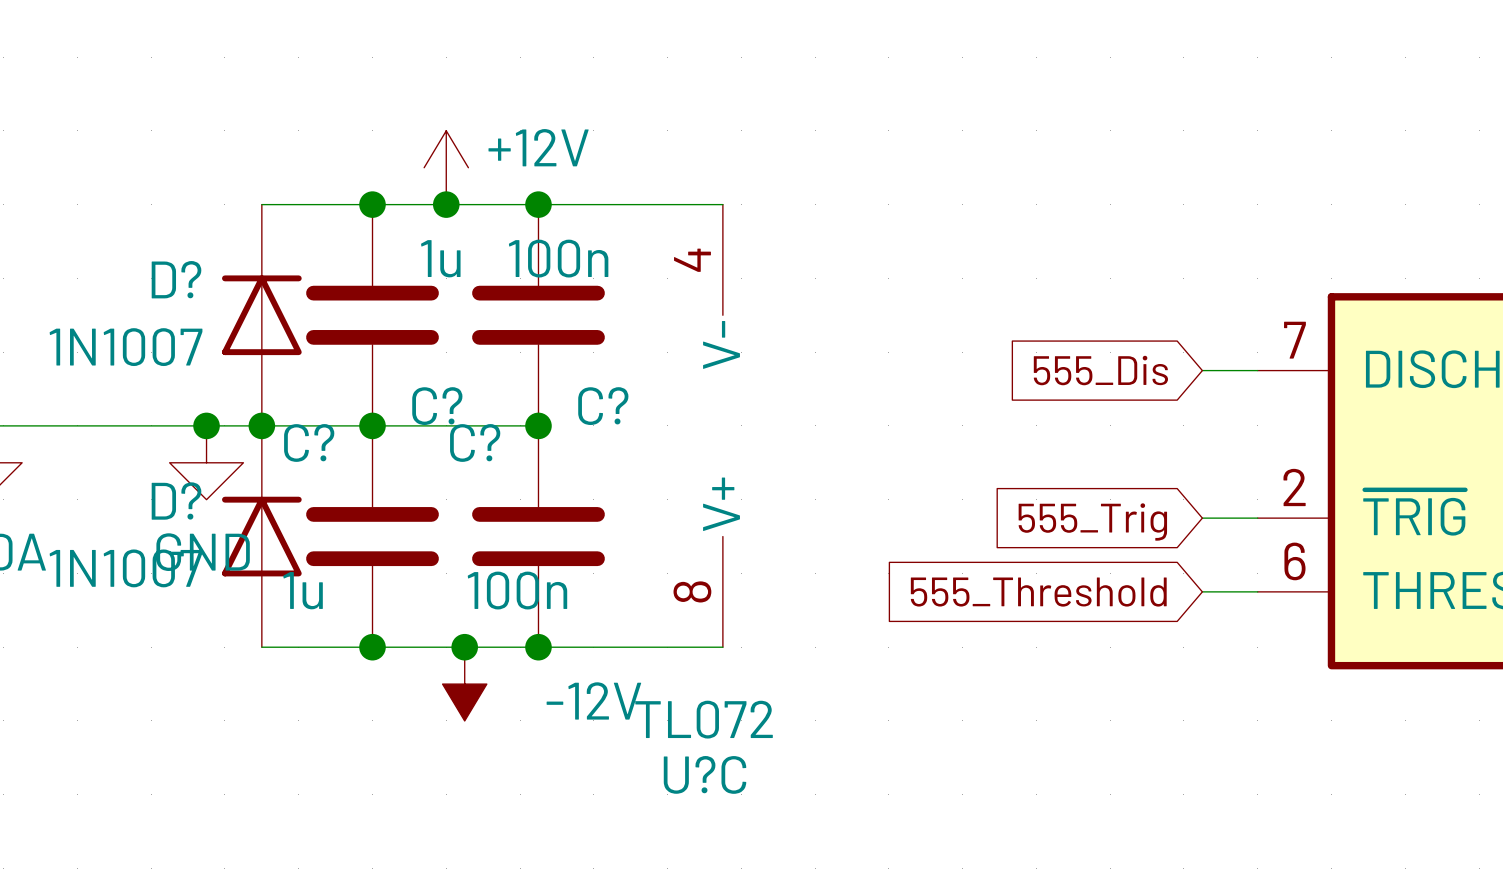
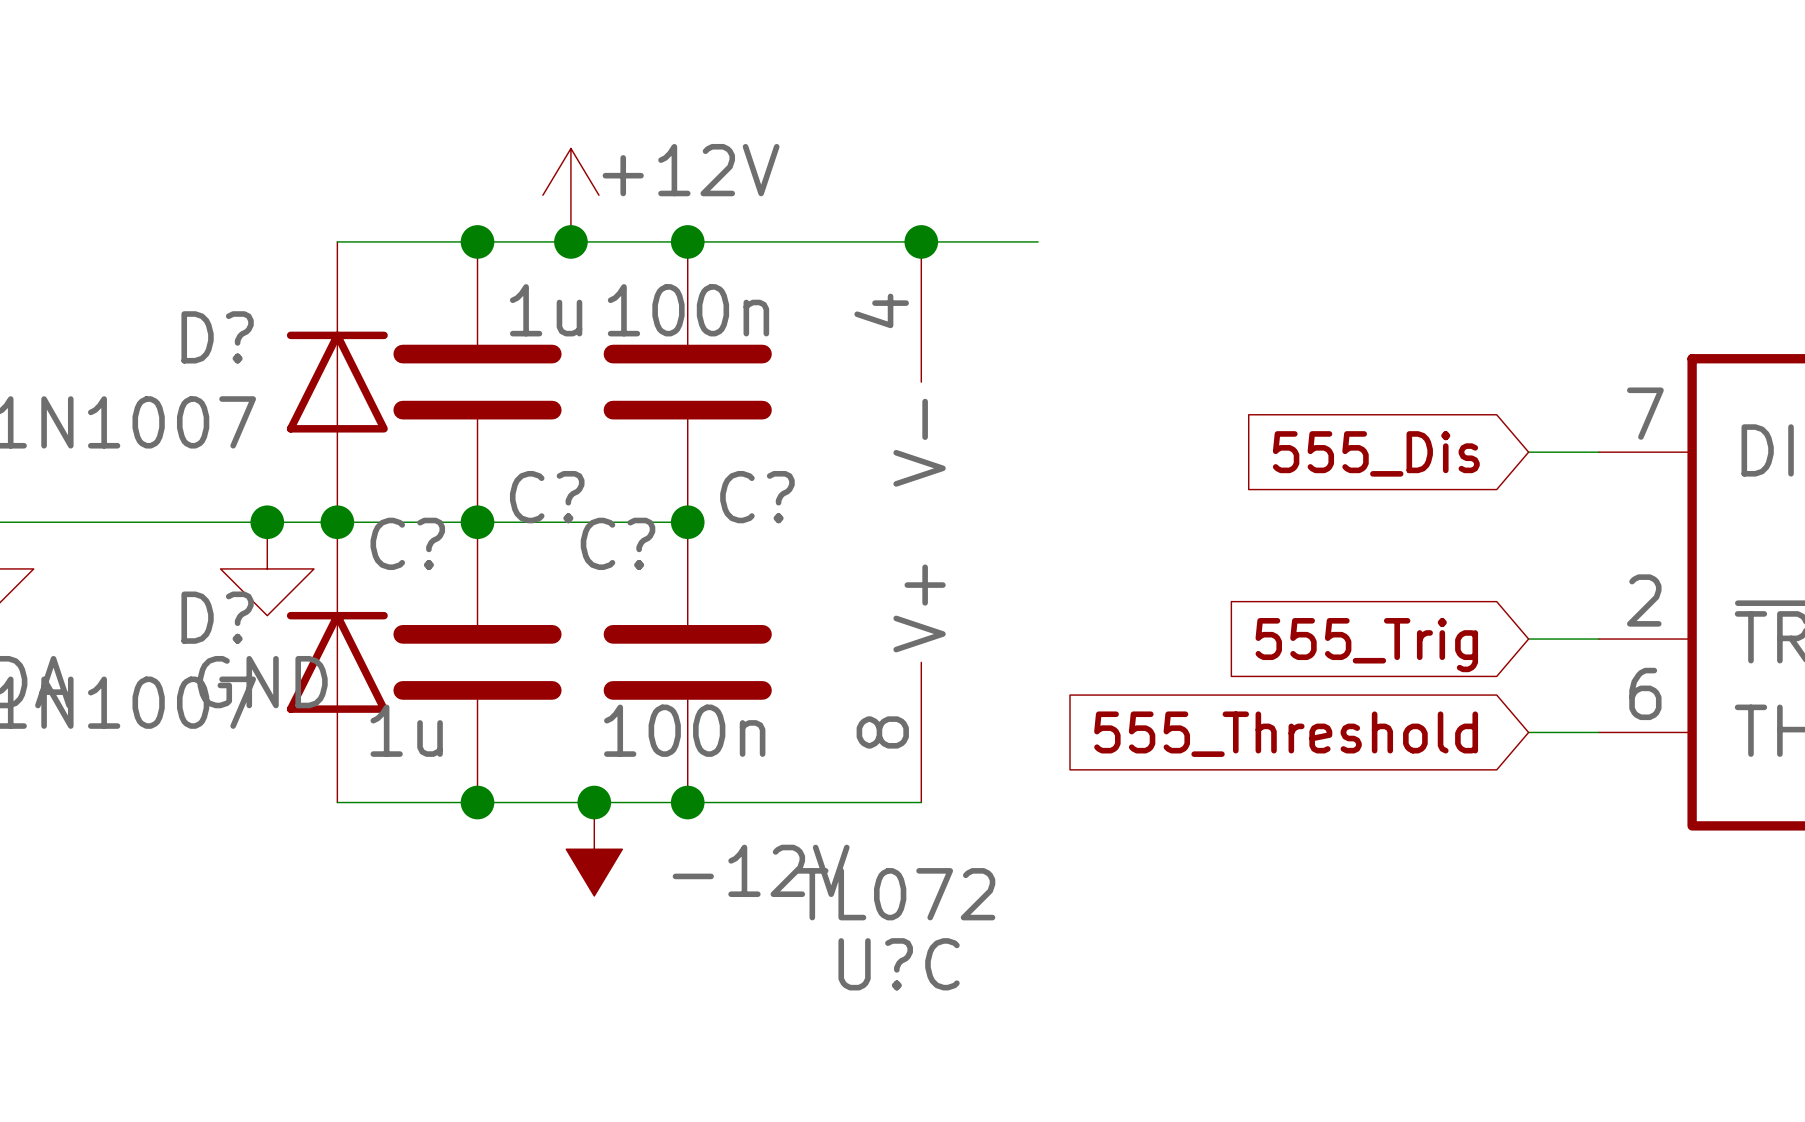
wire: none -> (921, 241) (1038, 241)
junction: none -> (921, 241)

